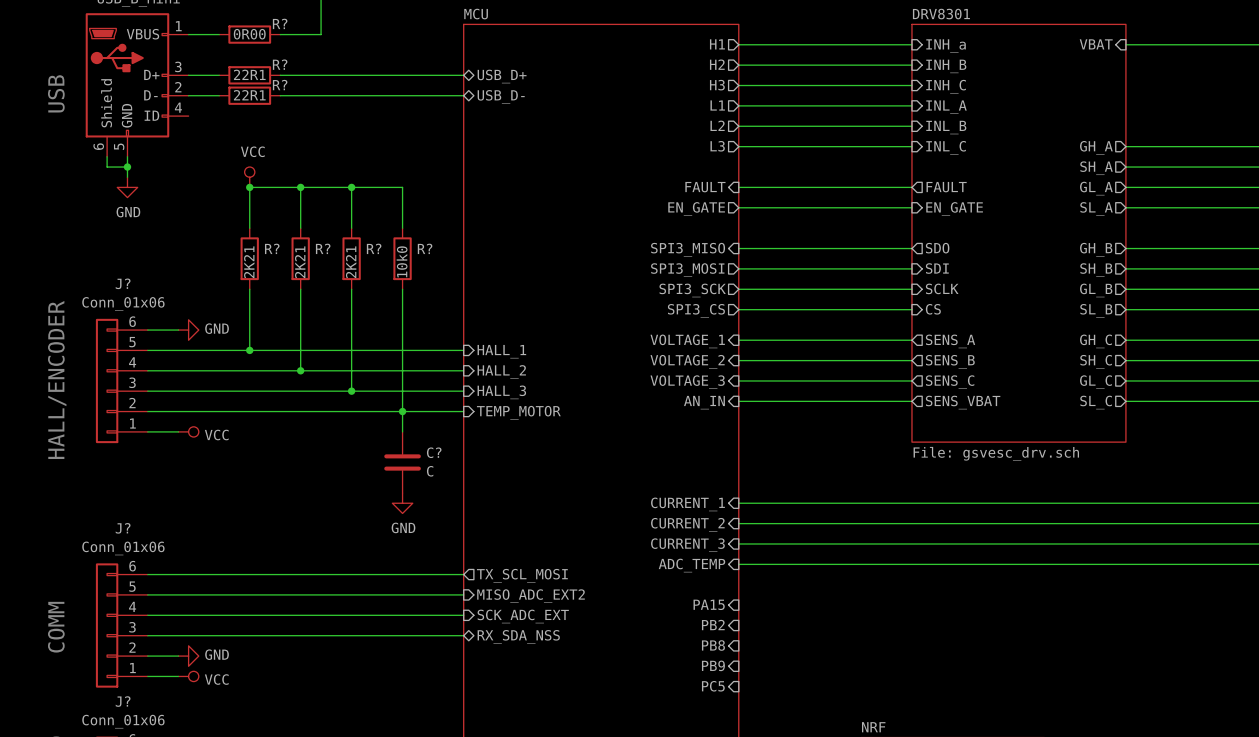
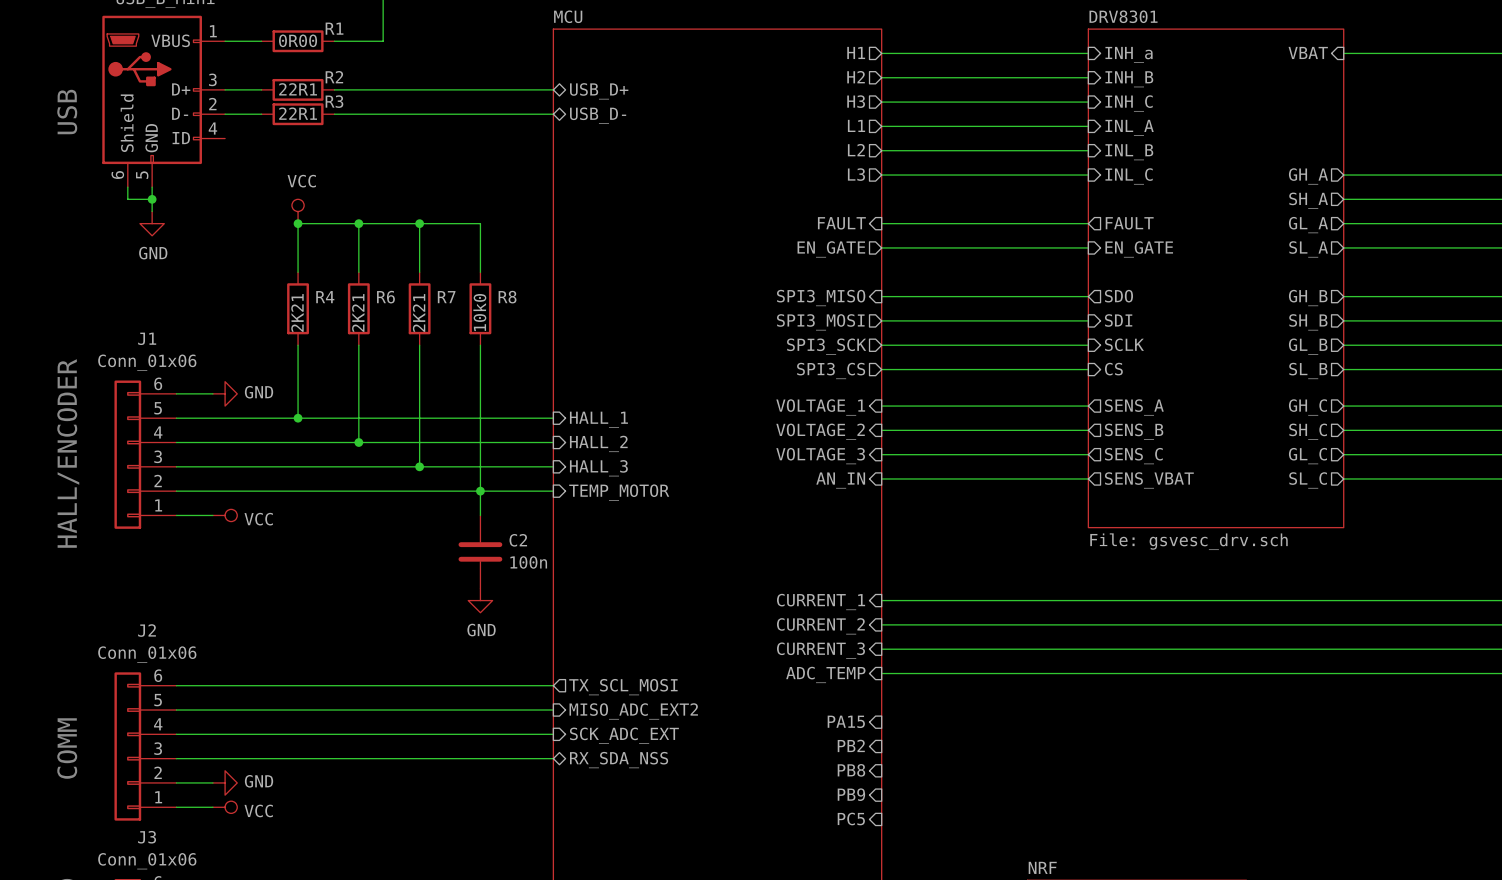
R? name: R? (280, 23) -> R1 (334, 28)
R? name: R? (280, 64) -> R2 (334, 77)
R? name: R? (280, 85) -> R3 (334, 101)
R? name: R? (272, 248) -> R4 (325, 297)
R? name: R? (323, 248) -> R6 (385, 297)
R? name: R? (374, 248) -> R7 (446, 297)
R? name: R? (425, 248) -> R8 (507, 297)
J? name: J? (123, 283) -> J1 (147, 338)
C? name: C? (434, 452) -> C2 (518, 540)
C? value: C (430, 471) -> 100n (528, 562)
J? name: J? (123, 528) -> J2 (147, 630)
J? name: J? (123, 701) -> J3 (147, 837)

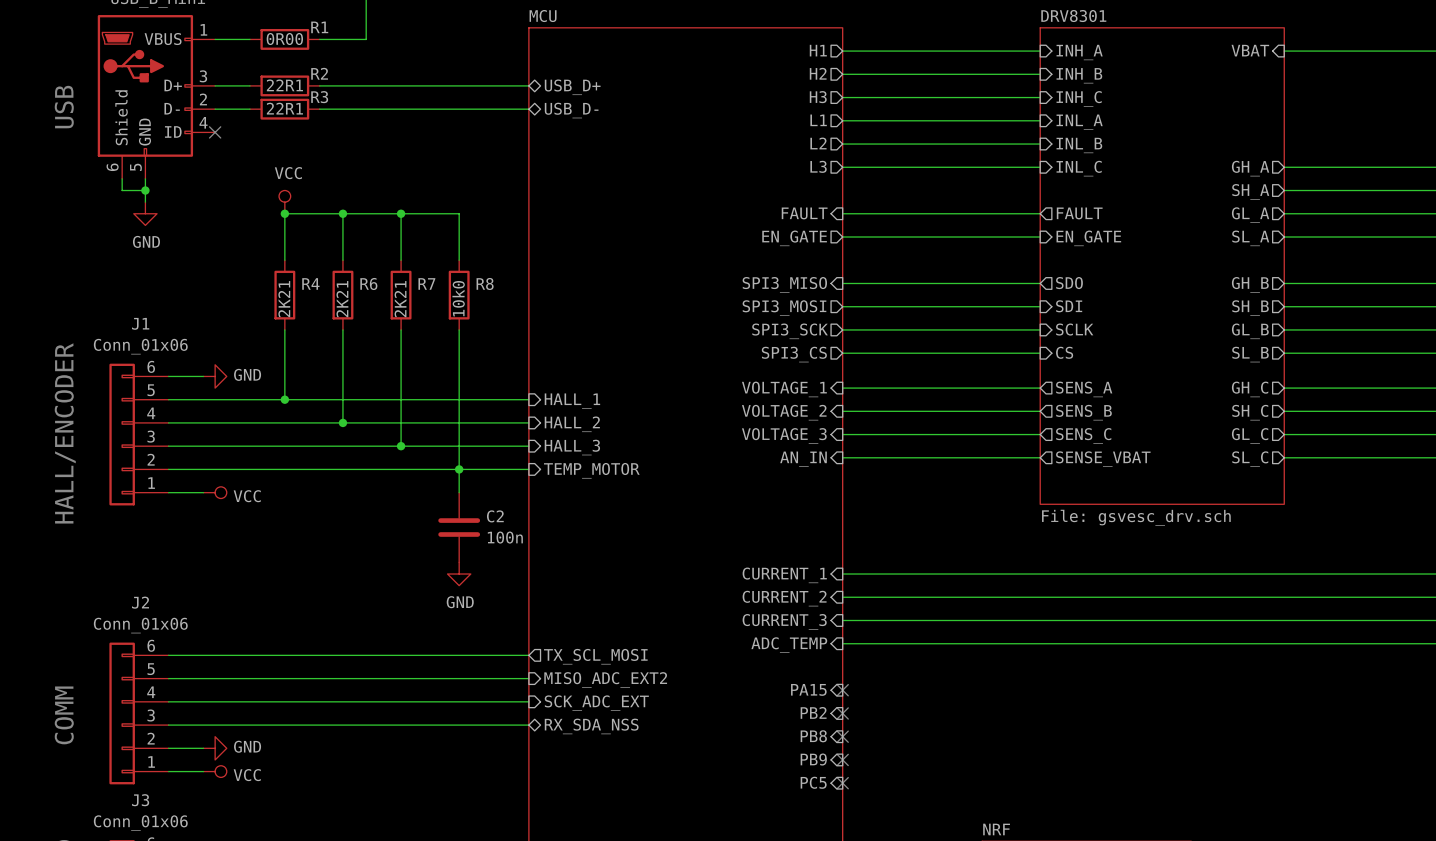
sheet pin: INH_a (1129, 54) -> INH_A (1079, 52)
no-connect mark: none -> (215, 132)
sheet pin: SENS_VBAT (1149, 480) -> SENSE_VBAT (1103, 459)
no-connect mark: none -> (842, 690)
no-connect mark: none -> (842, 713)
no-connect mark: none -> (842, 736)
no-connect mark: none -> (842, 759)
no-connect mark: none -> (842, 783)

